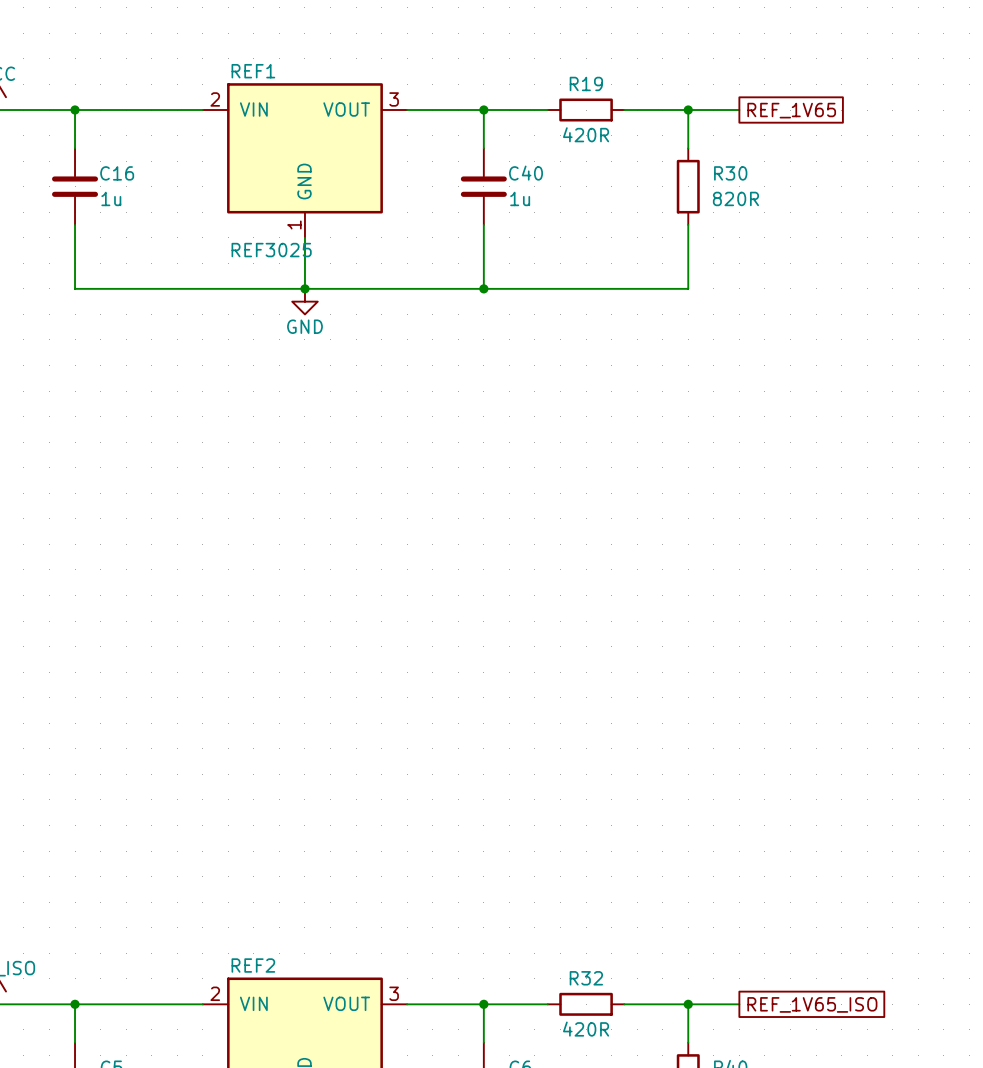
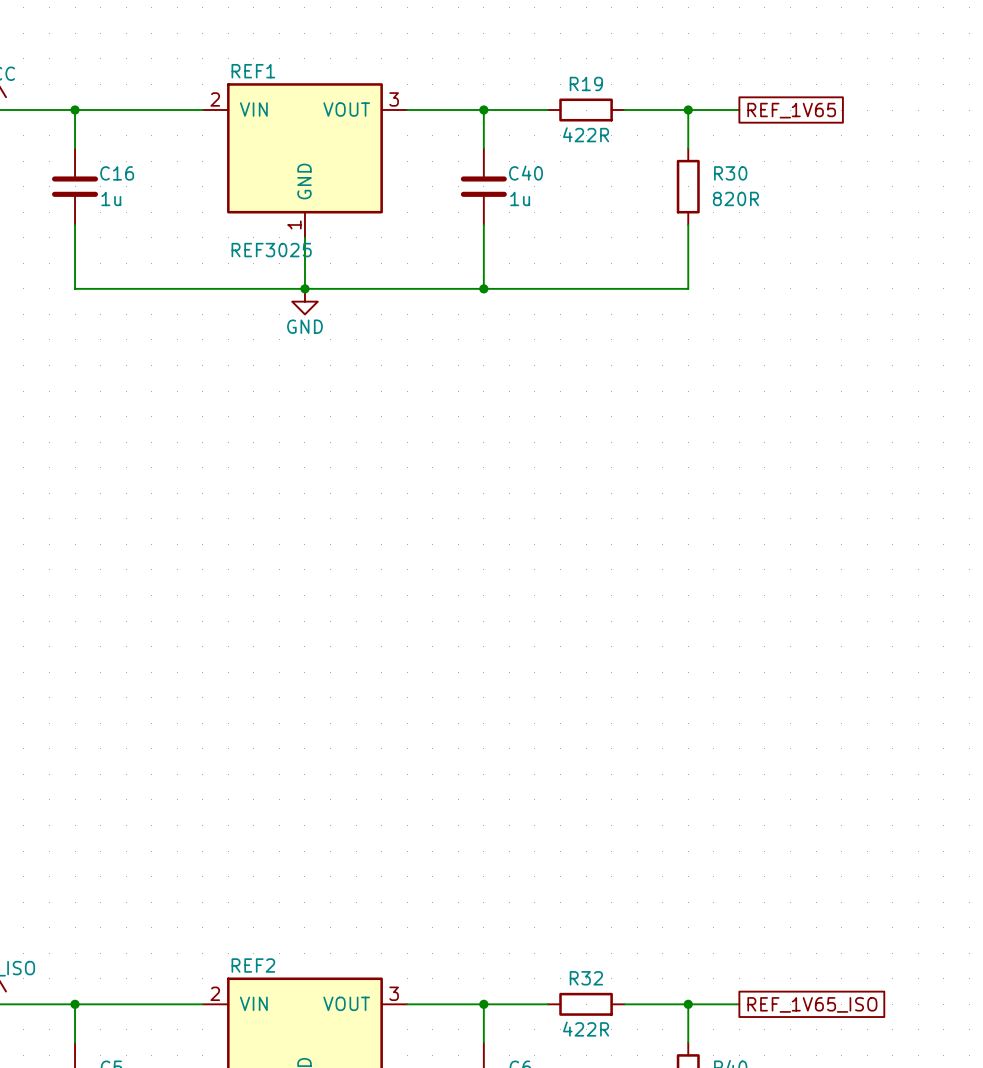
R19 value: 420R (586, 134) -> 422R (586, 134)
R32 value: 420R (586, 1029) -> 422R (586, 1029)

